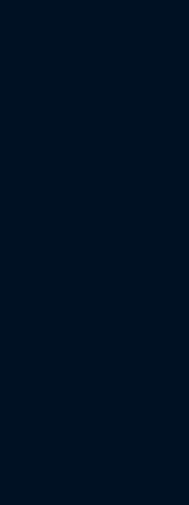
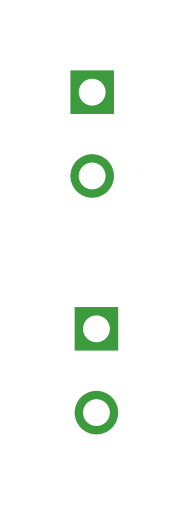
part: none -> (92, 134)
part: none -> (96, 370)

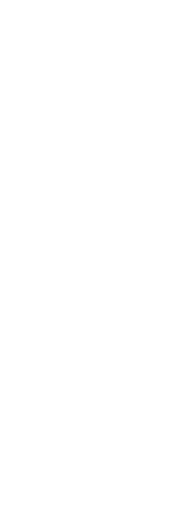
part: (92, 134) -> none
part: (96, 370) -> none

